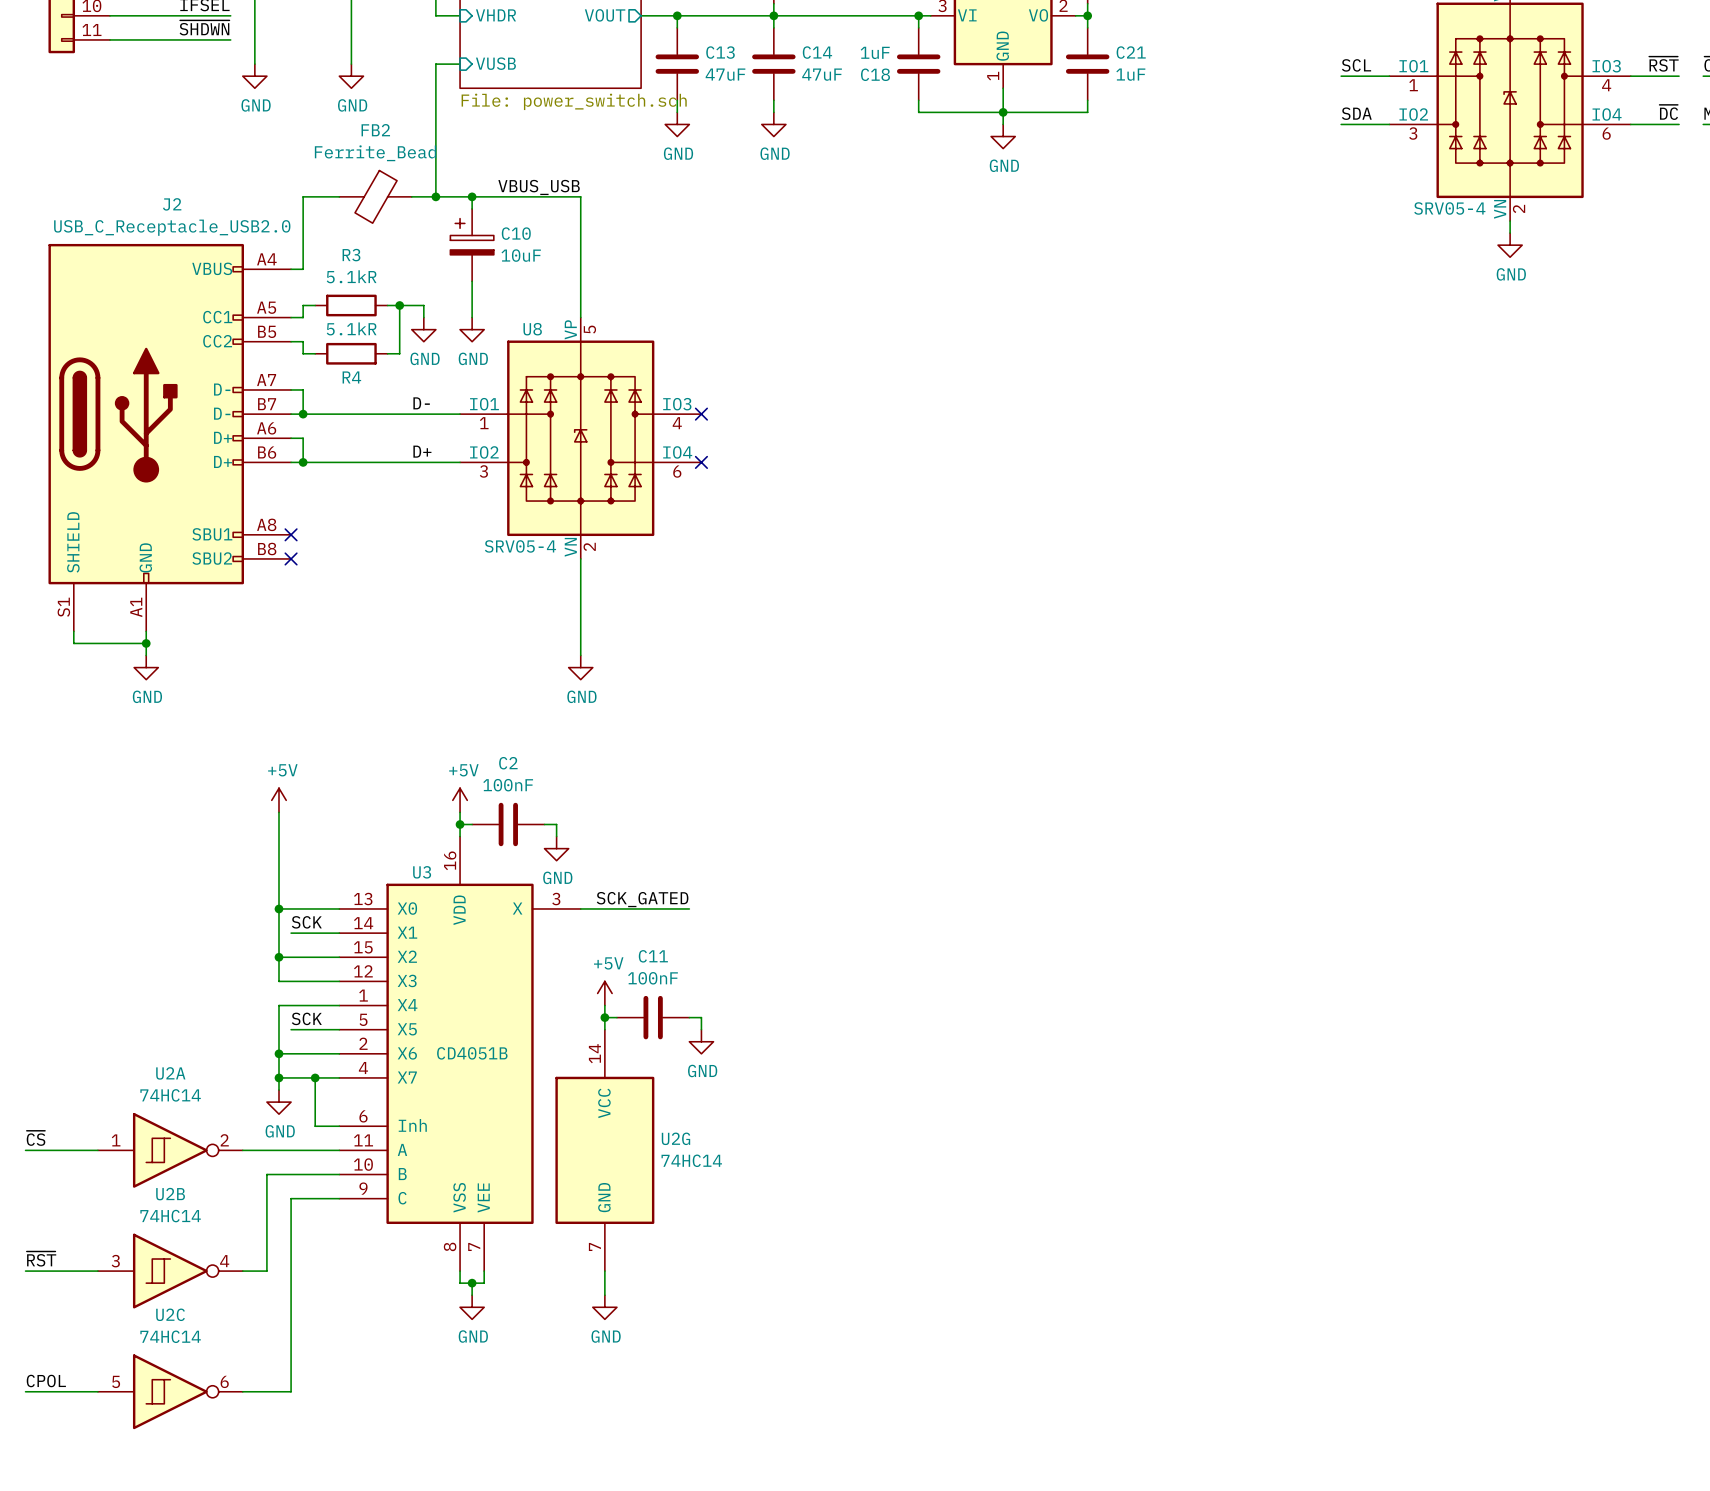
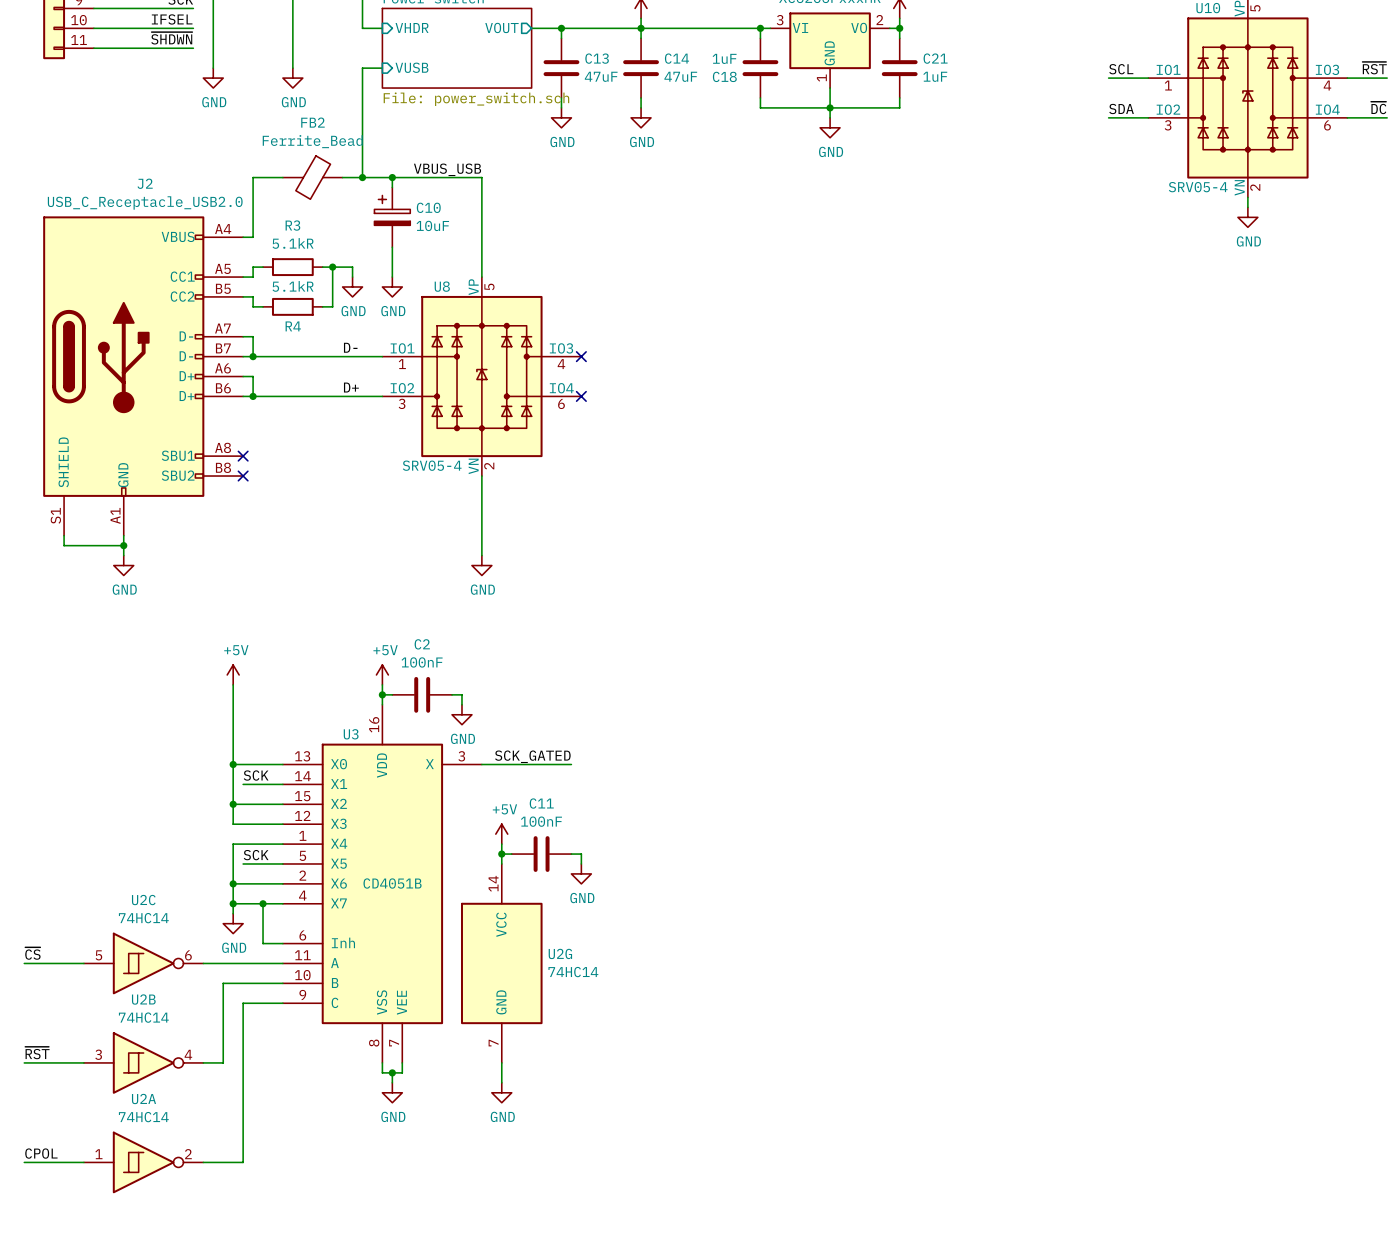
U2A position: (170, 1150) -> (143, 1162)
U2C position: (170, 1391) -> (143, 963)

